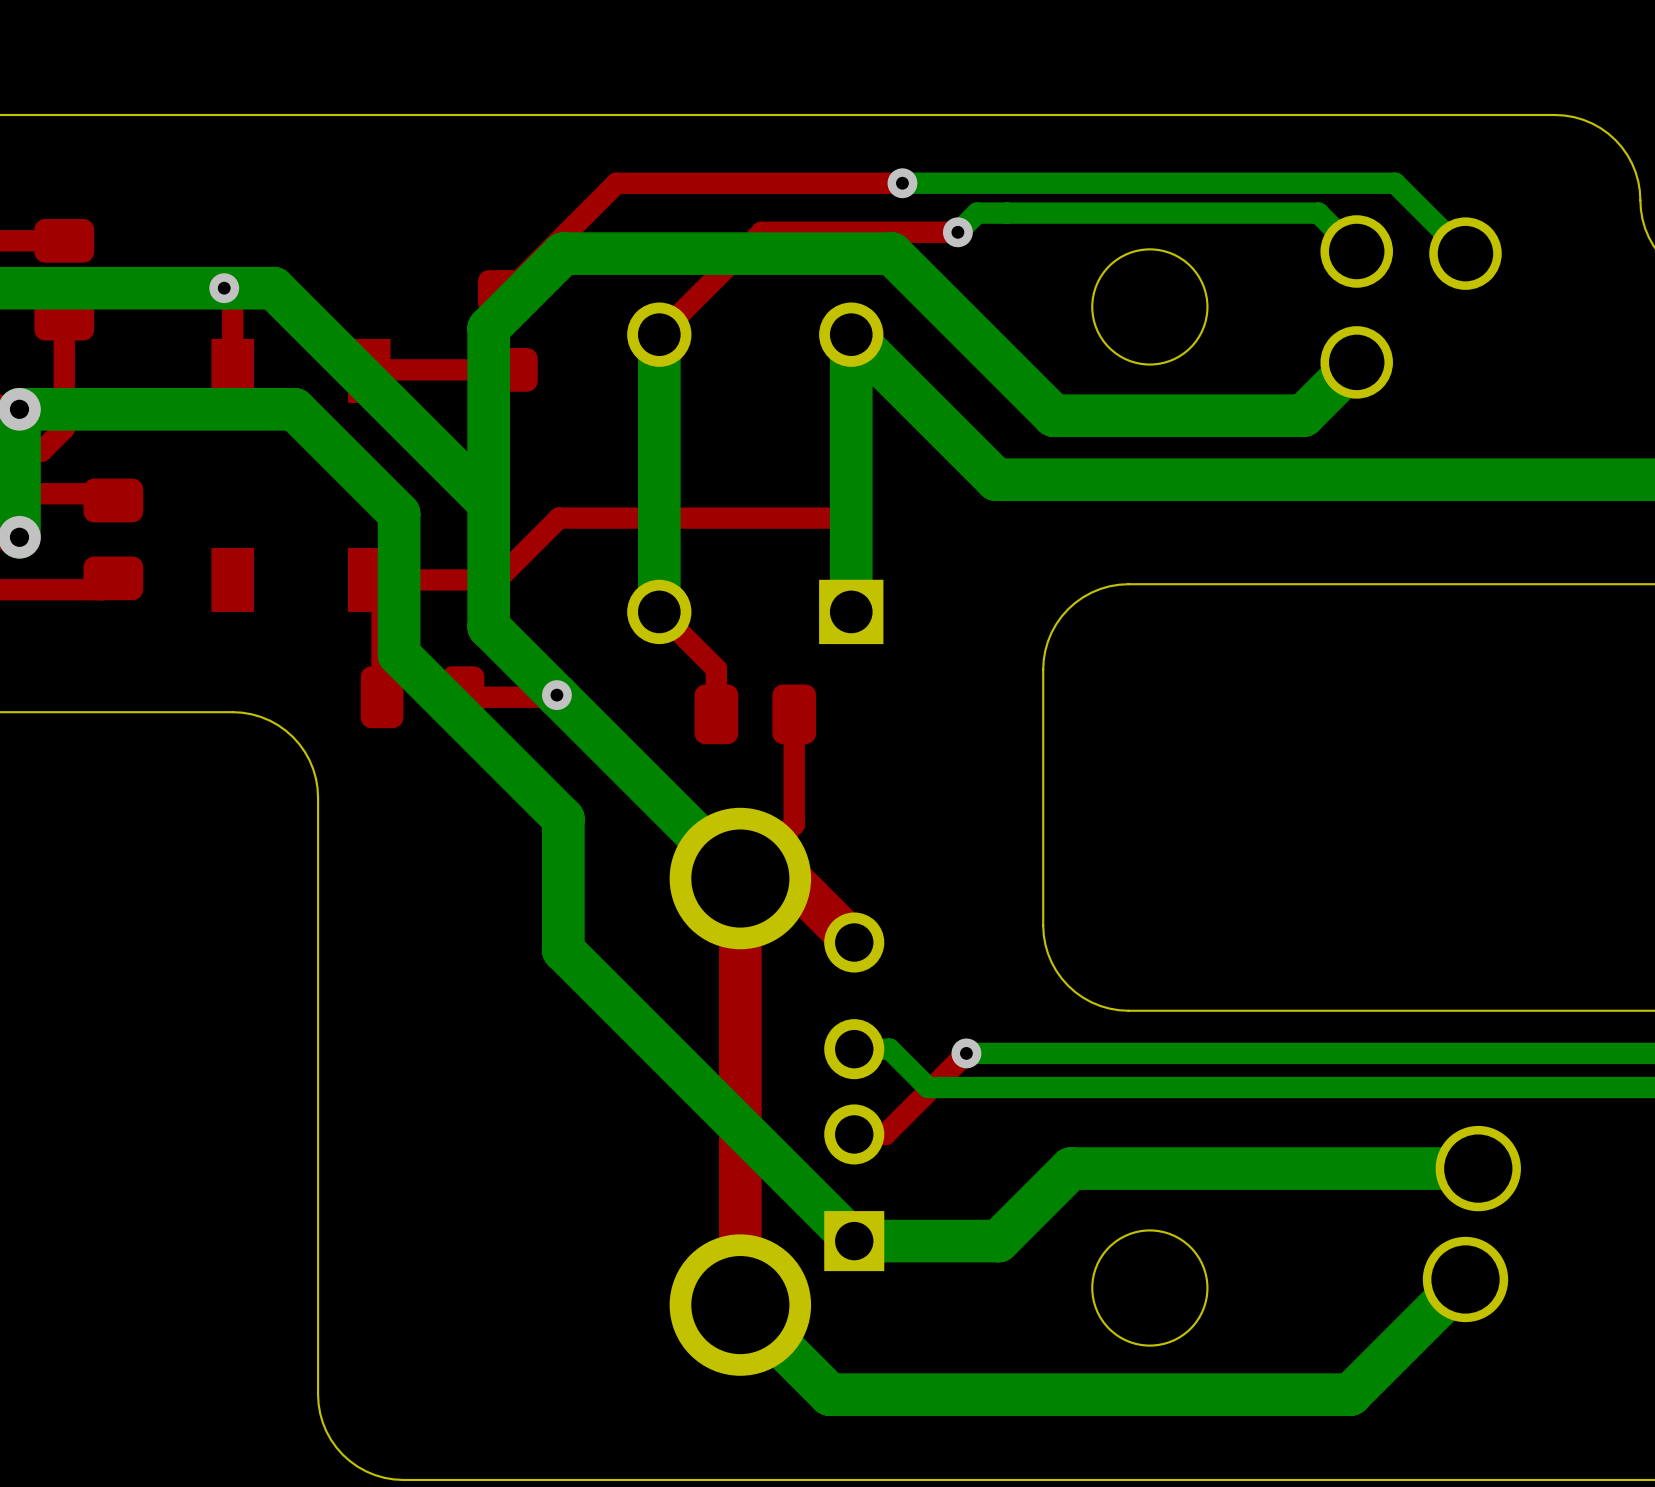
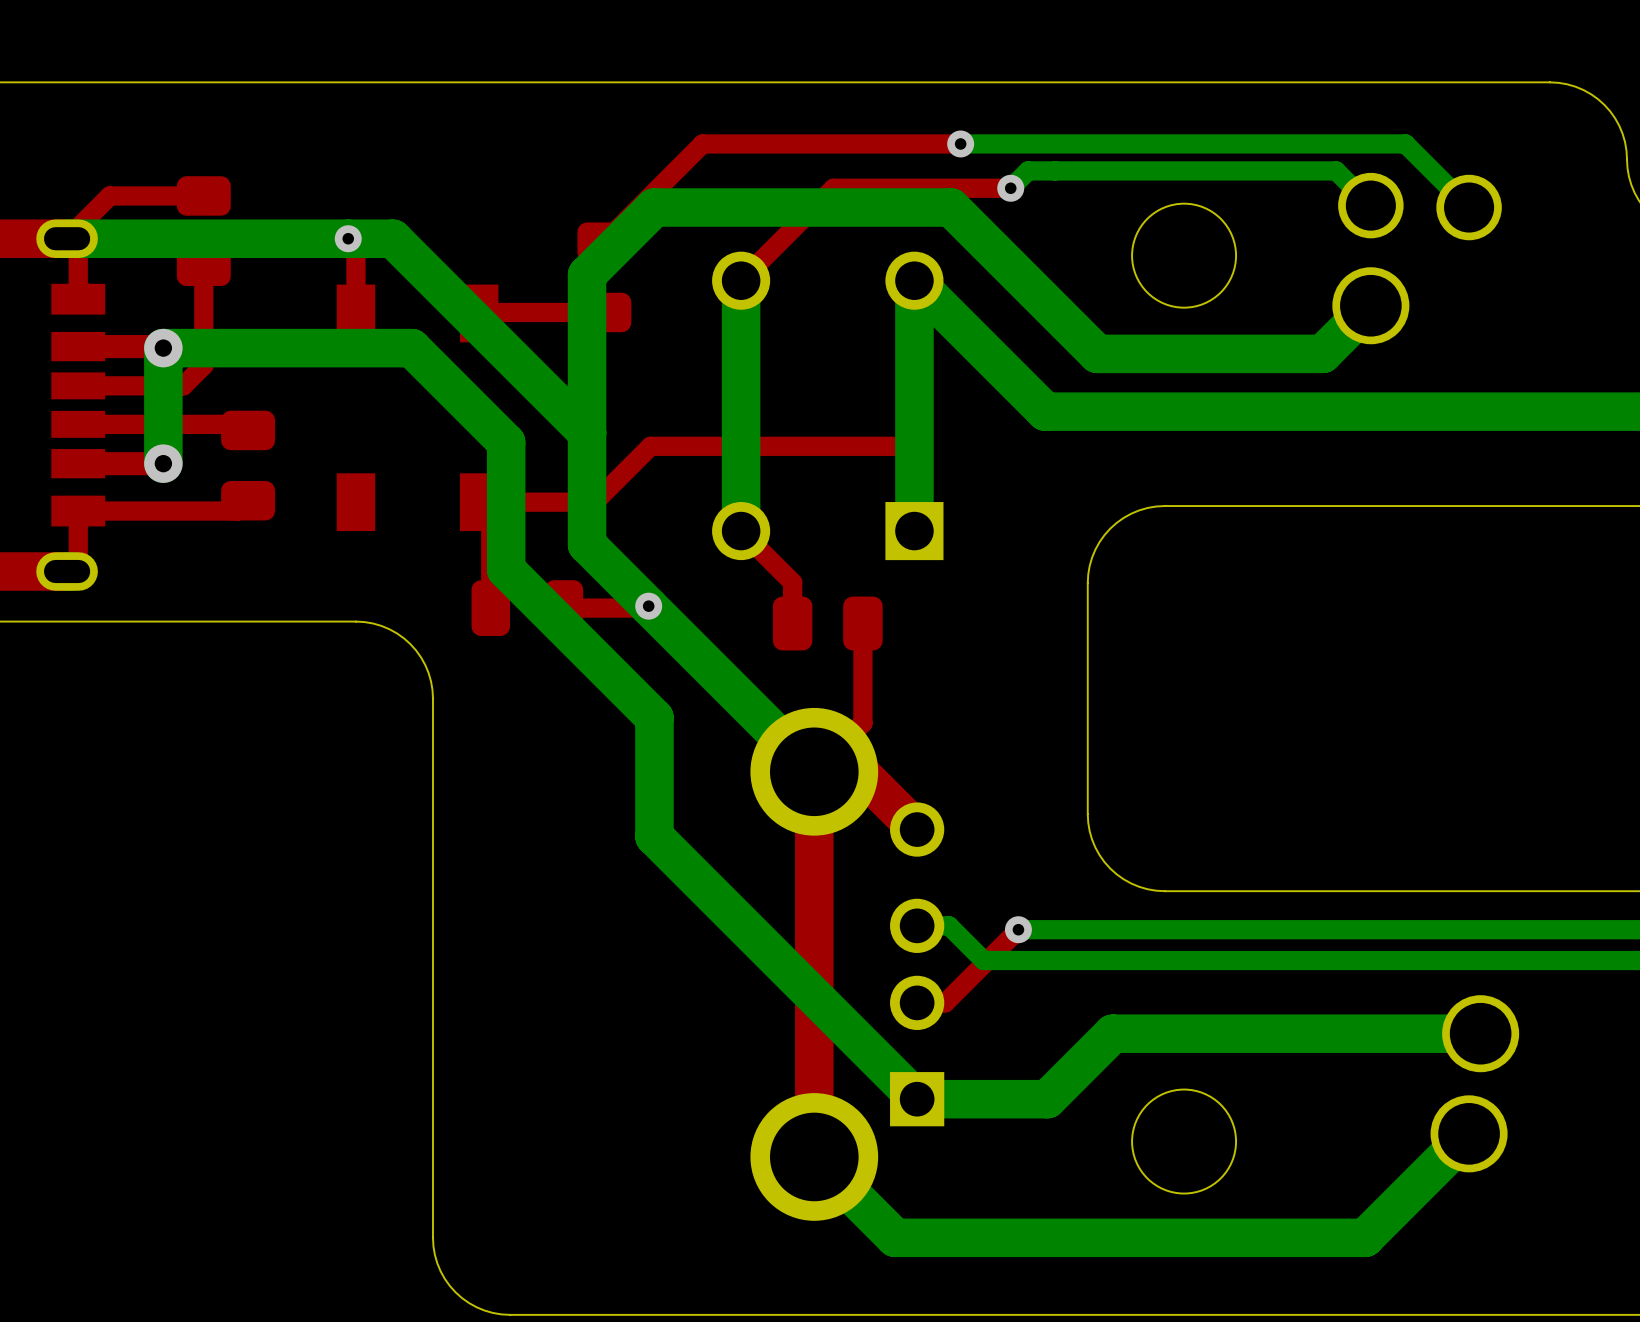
part footprint: [1320, 326, 1393, 399] -> [1332, 267, 1410, 345]

